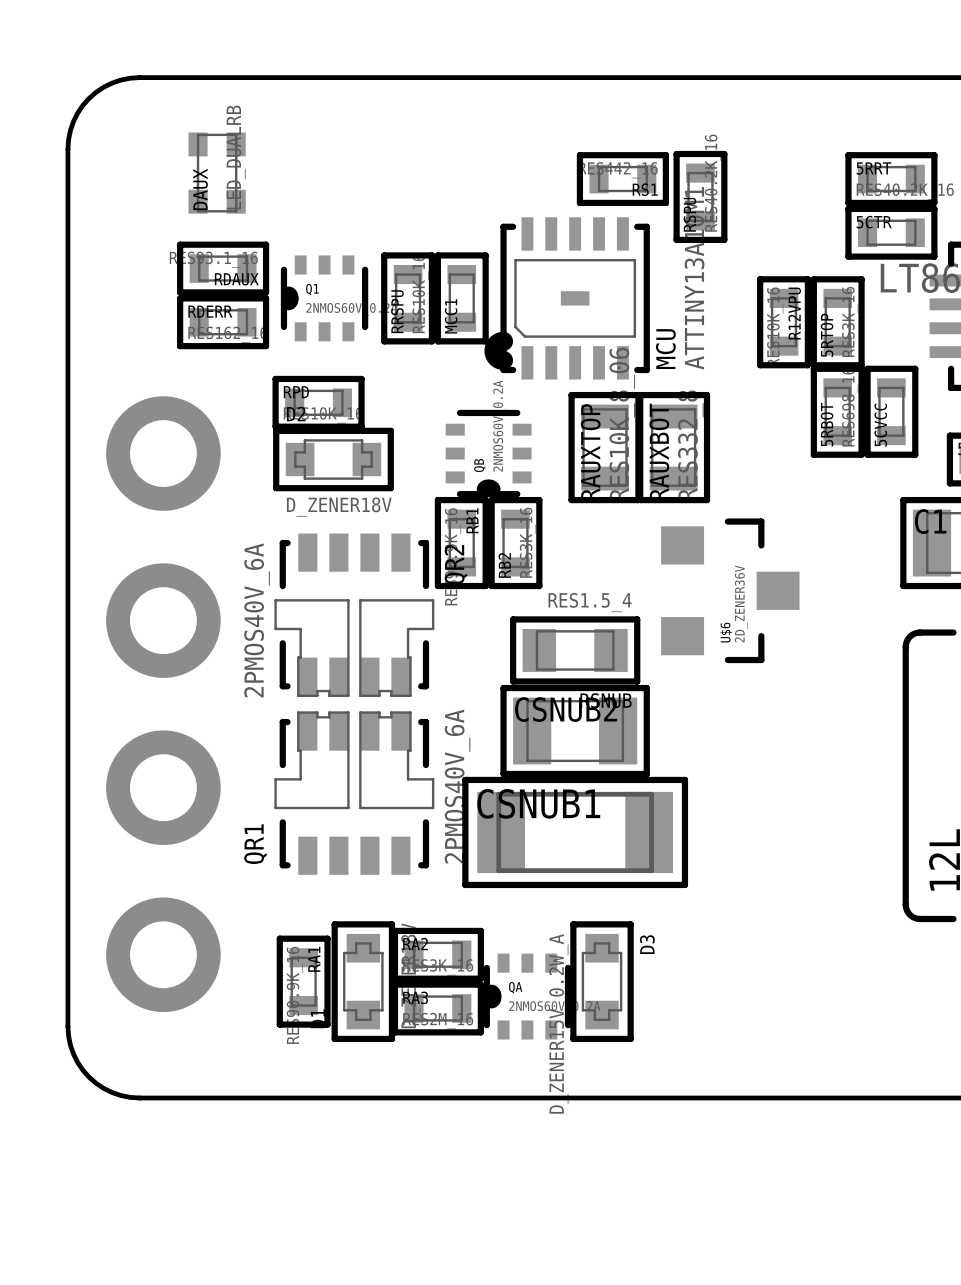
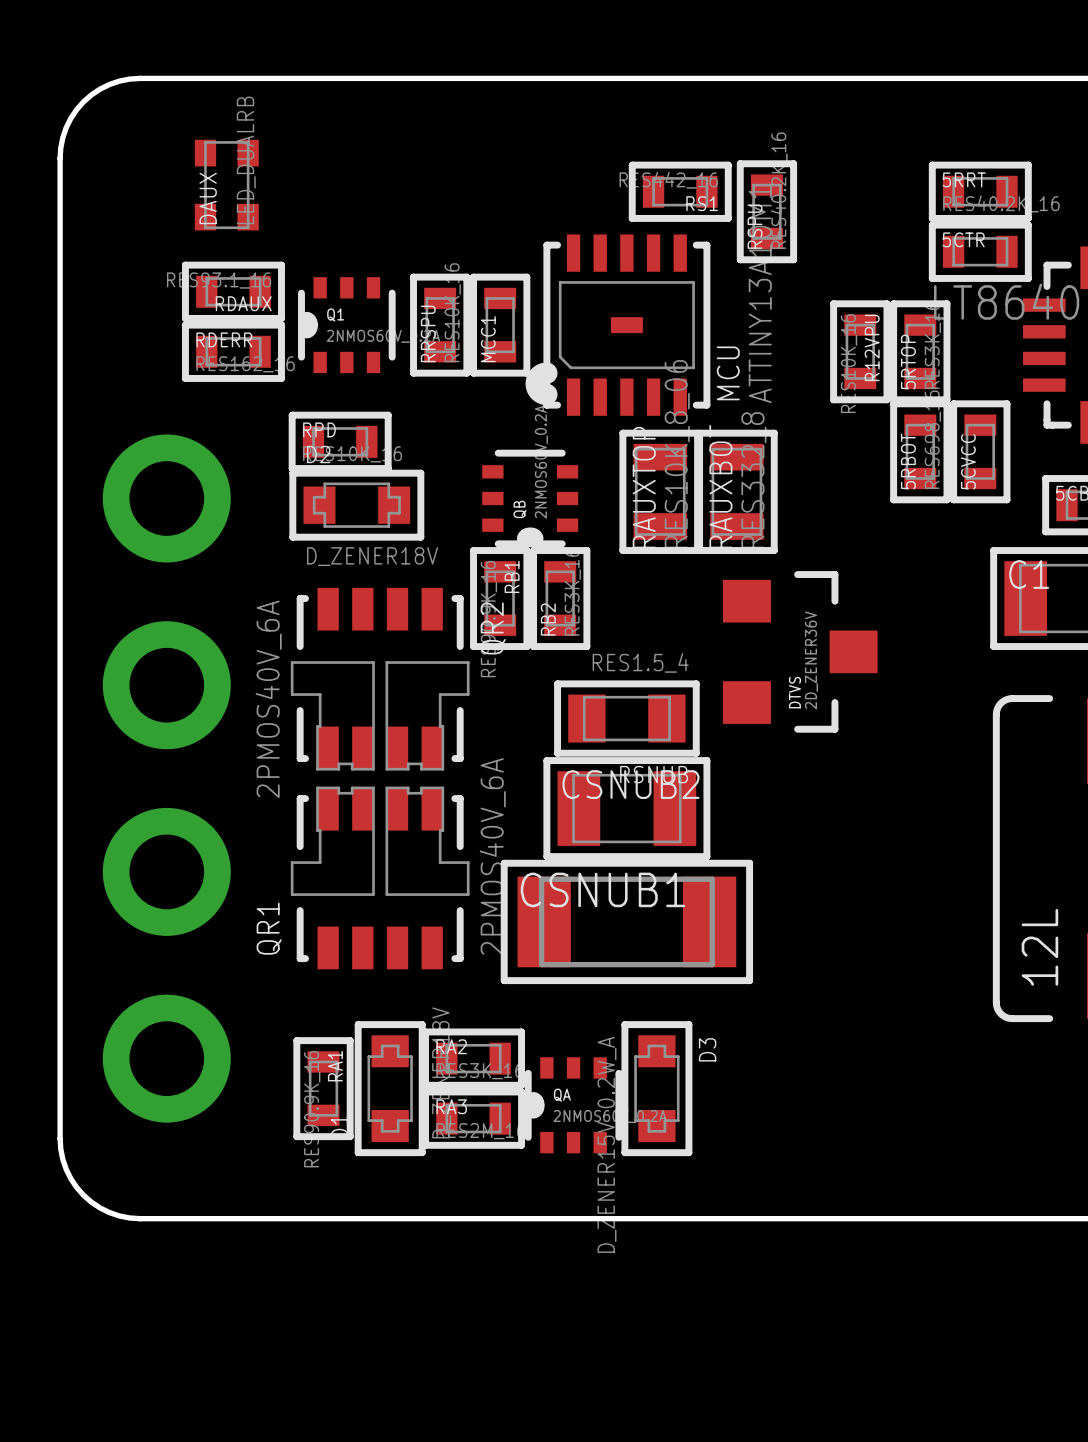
U$6 name: U$6 (726, 632) -> DTVS (794, 692)

